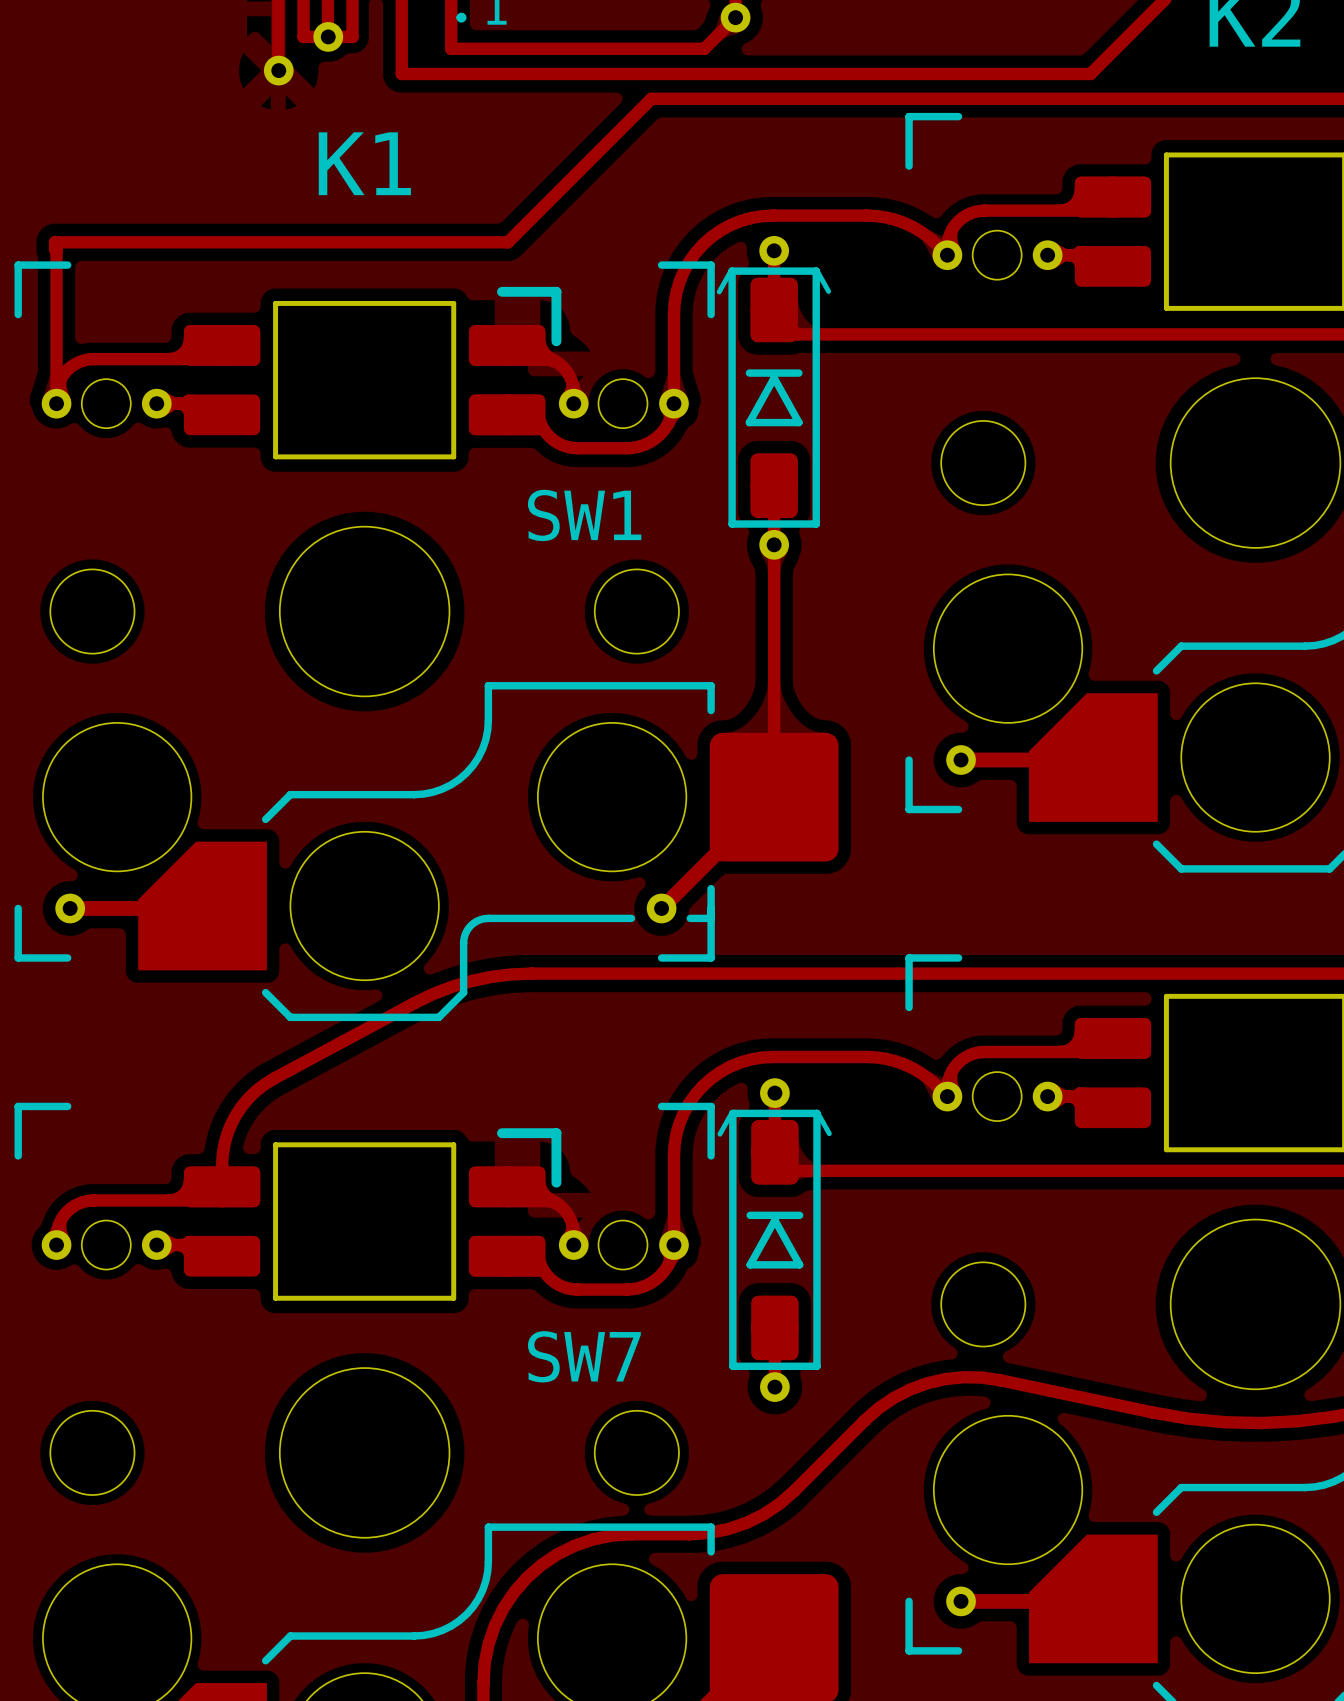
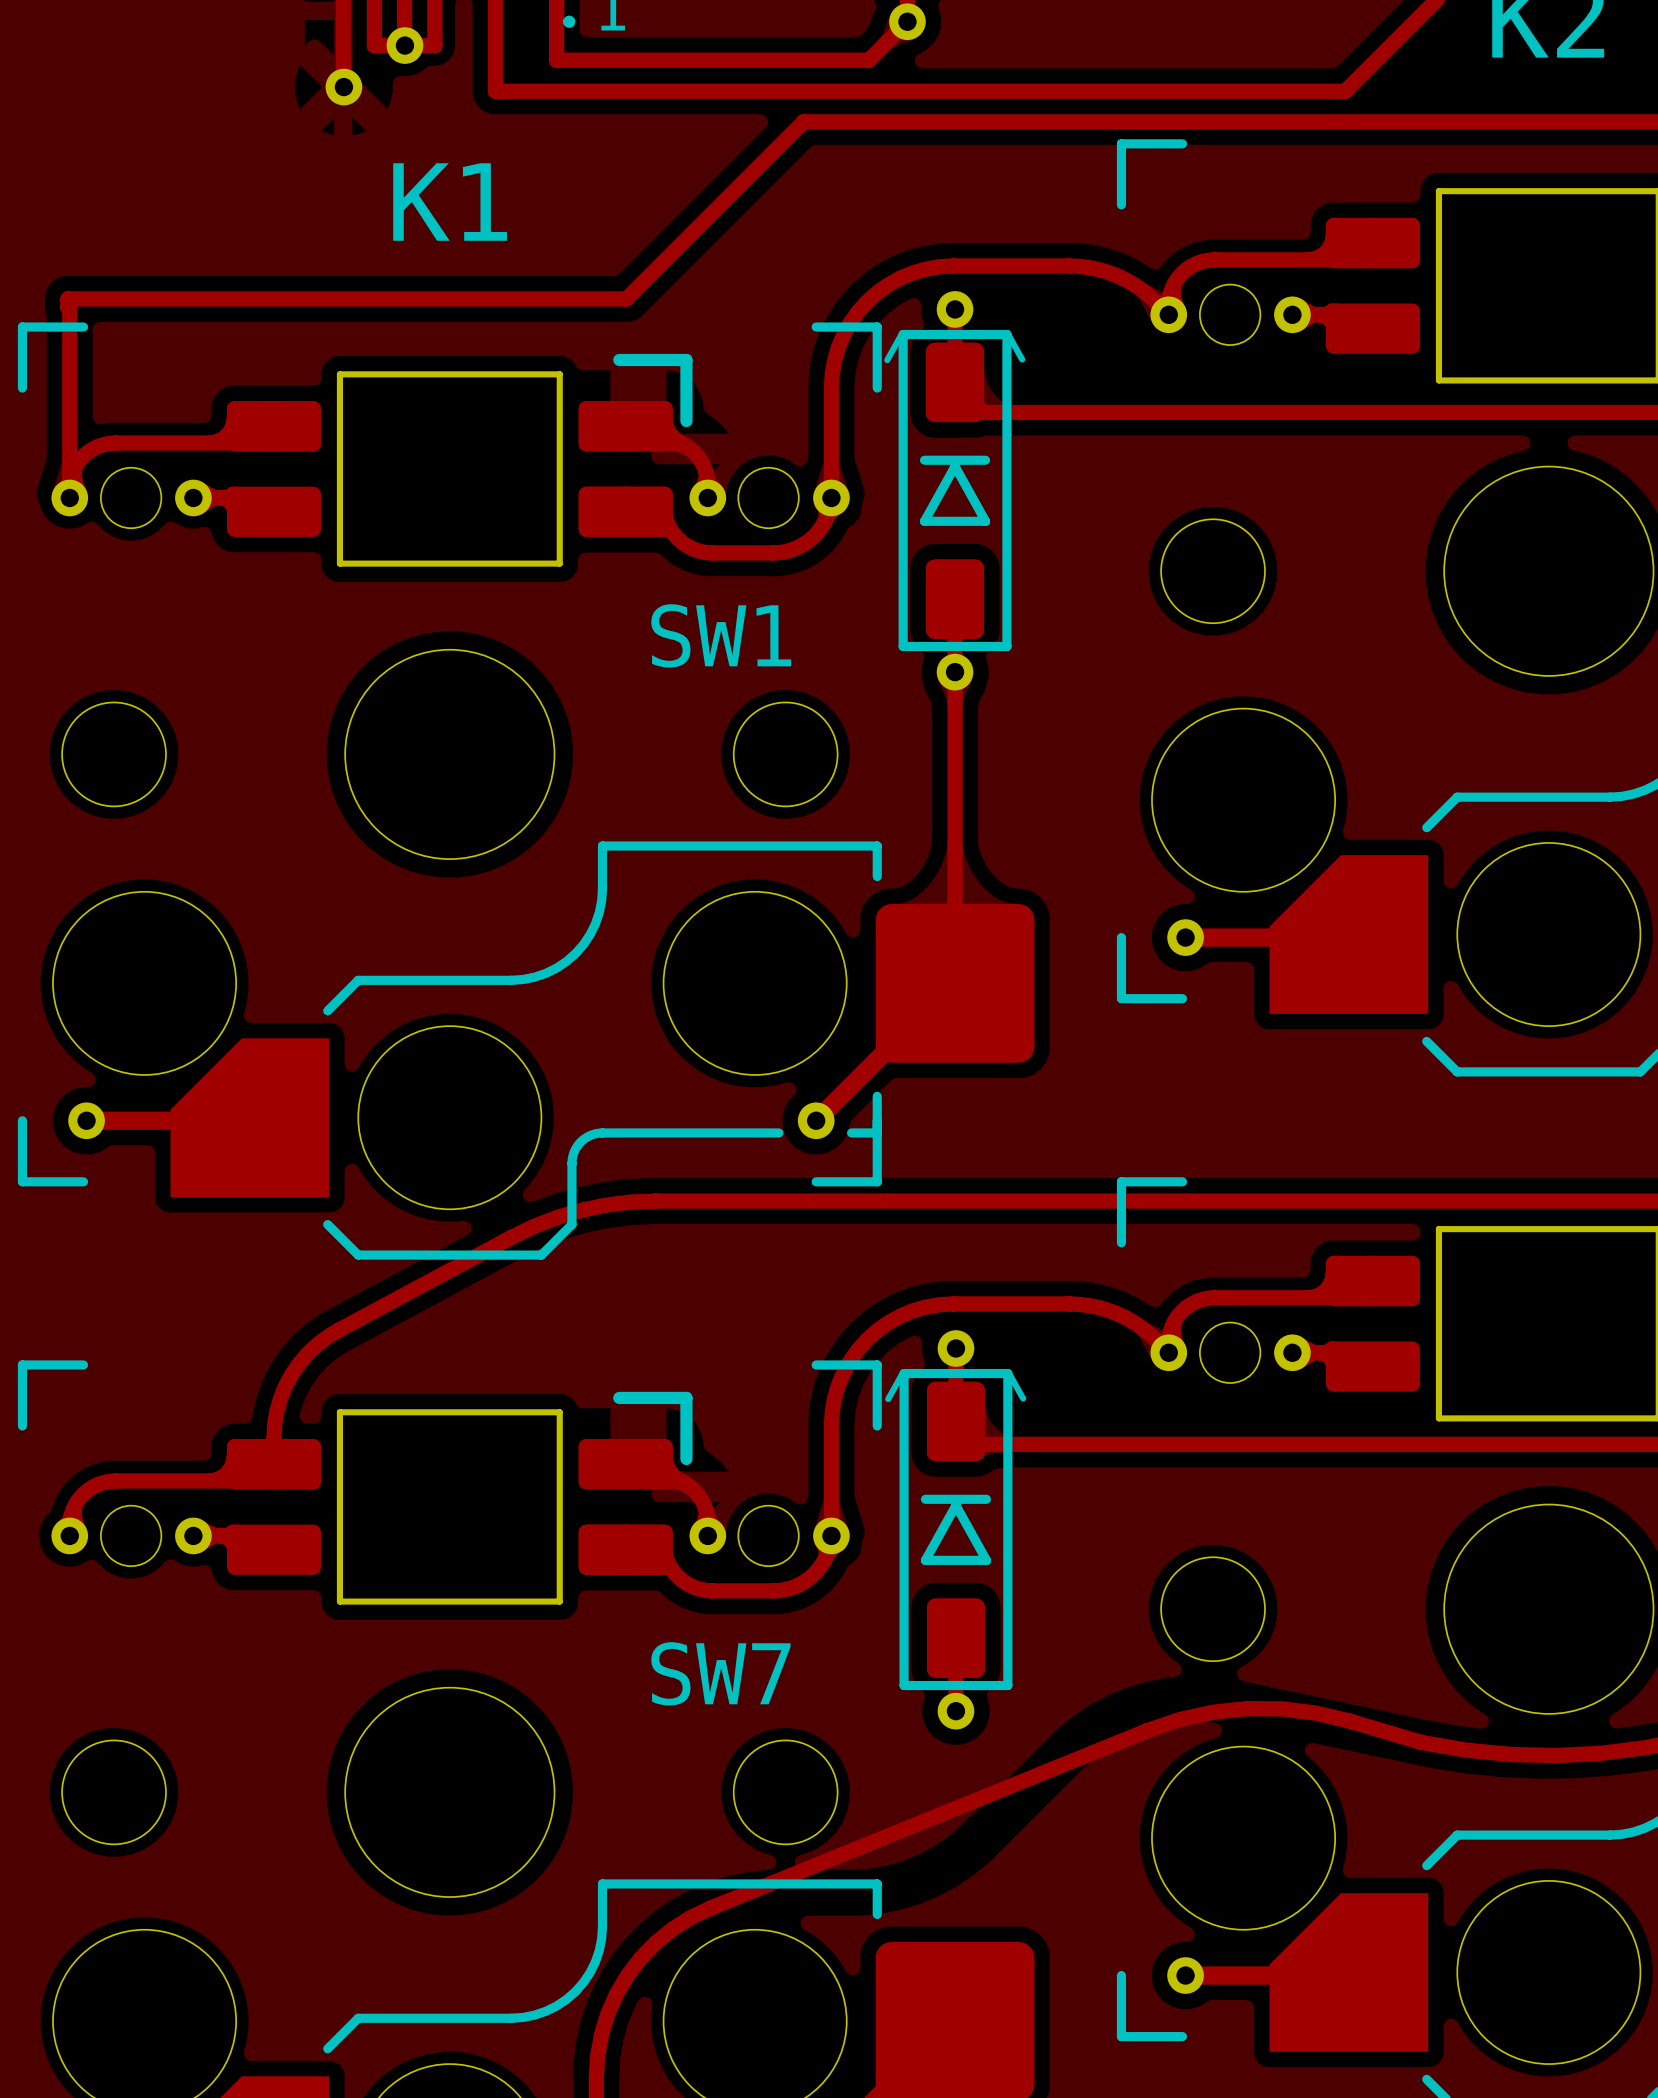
track: (1152, 1412) (981, 1377) (945, 1379) (910, 1389) (878, 1408) (779, 1503) (746, 1522) (708, 1532) (631, 1534) (593, 1539) (557, 1554) (541, 1564) (514, 1592) (494, 1625) (484, 1663) (483, 1684) -> (1421, 1742) (1348, 1720) (1315, 1713) (1281, 1708) (1247, 1708) (1213, 1712) (1179, 1719) (1147, 1730) (710, 1908) (672, 1929) (655, 1942) (627, 1975) (607, 2014) (597, 2056) (596, 2077)

